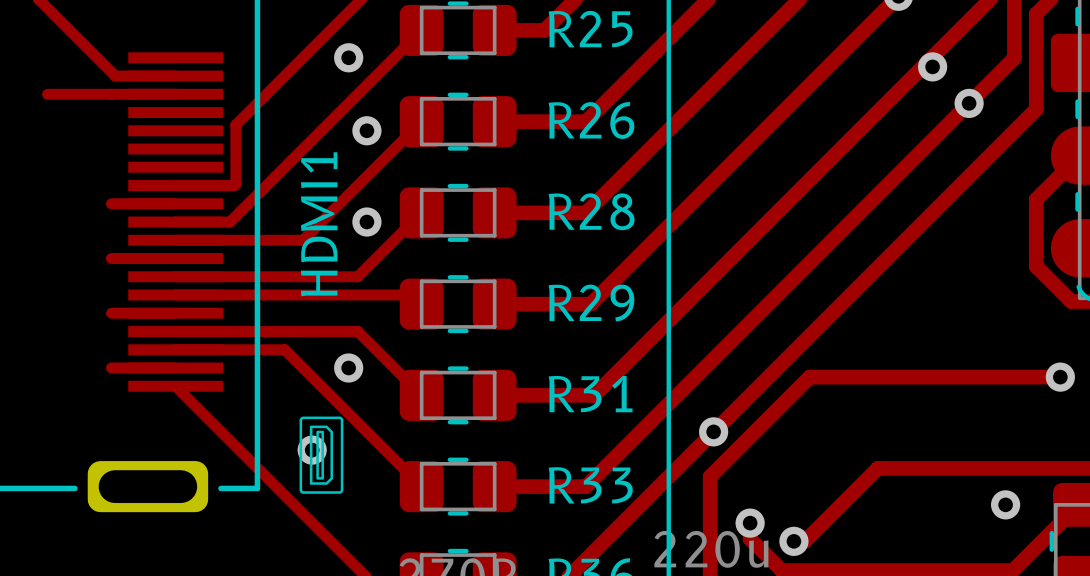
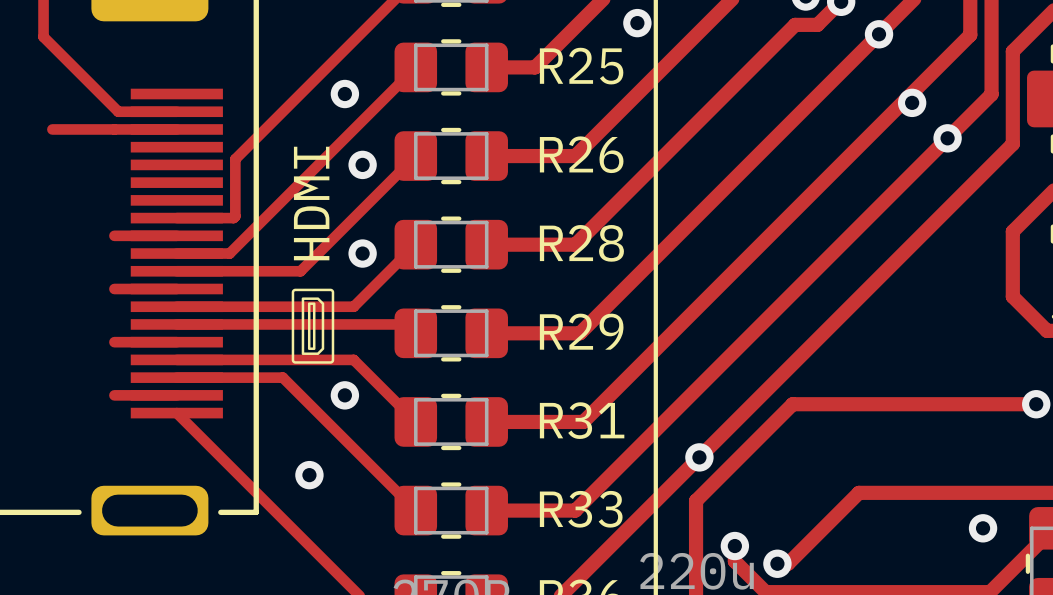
HDMI1 value: none -> HDMI (311, 203)
HDMI1 name: HDMI1 (319, 224) -> none
drawing position: (320, 455) -> (311, 326)
drawing position: (321, 455) -> (312, 326)
drawing position: (321, 455) -> (312, 326)

